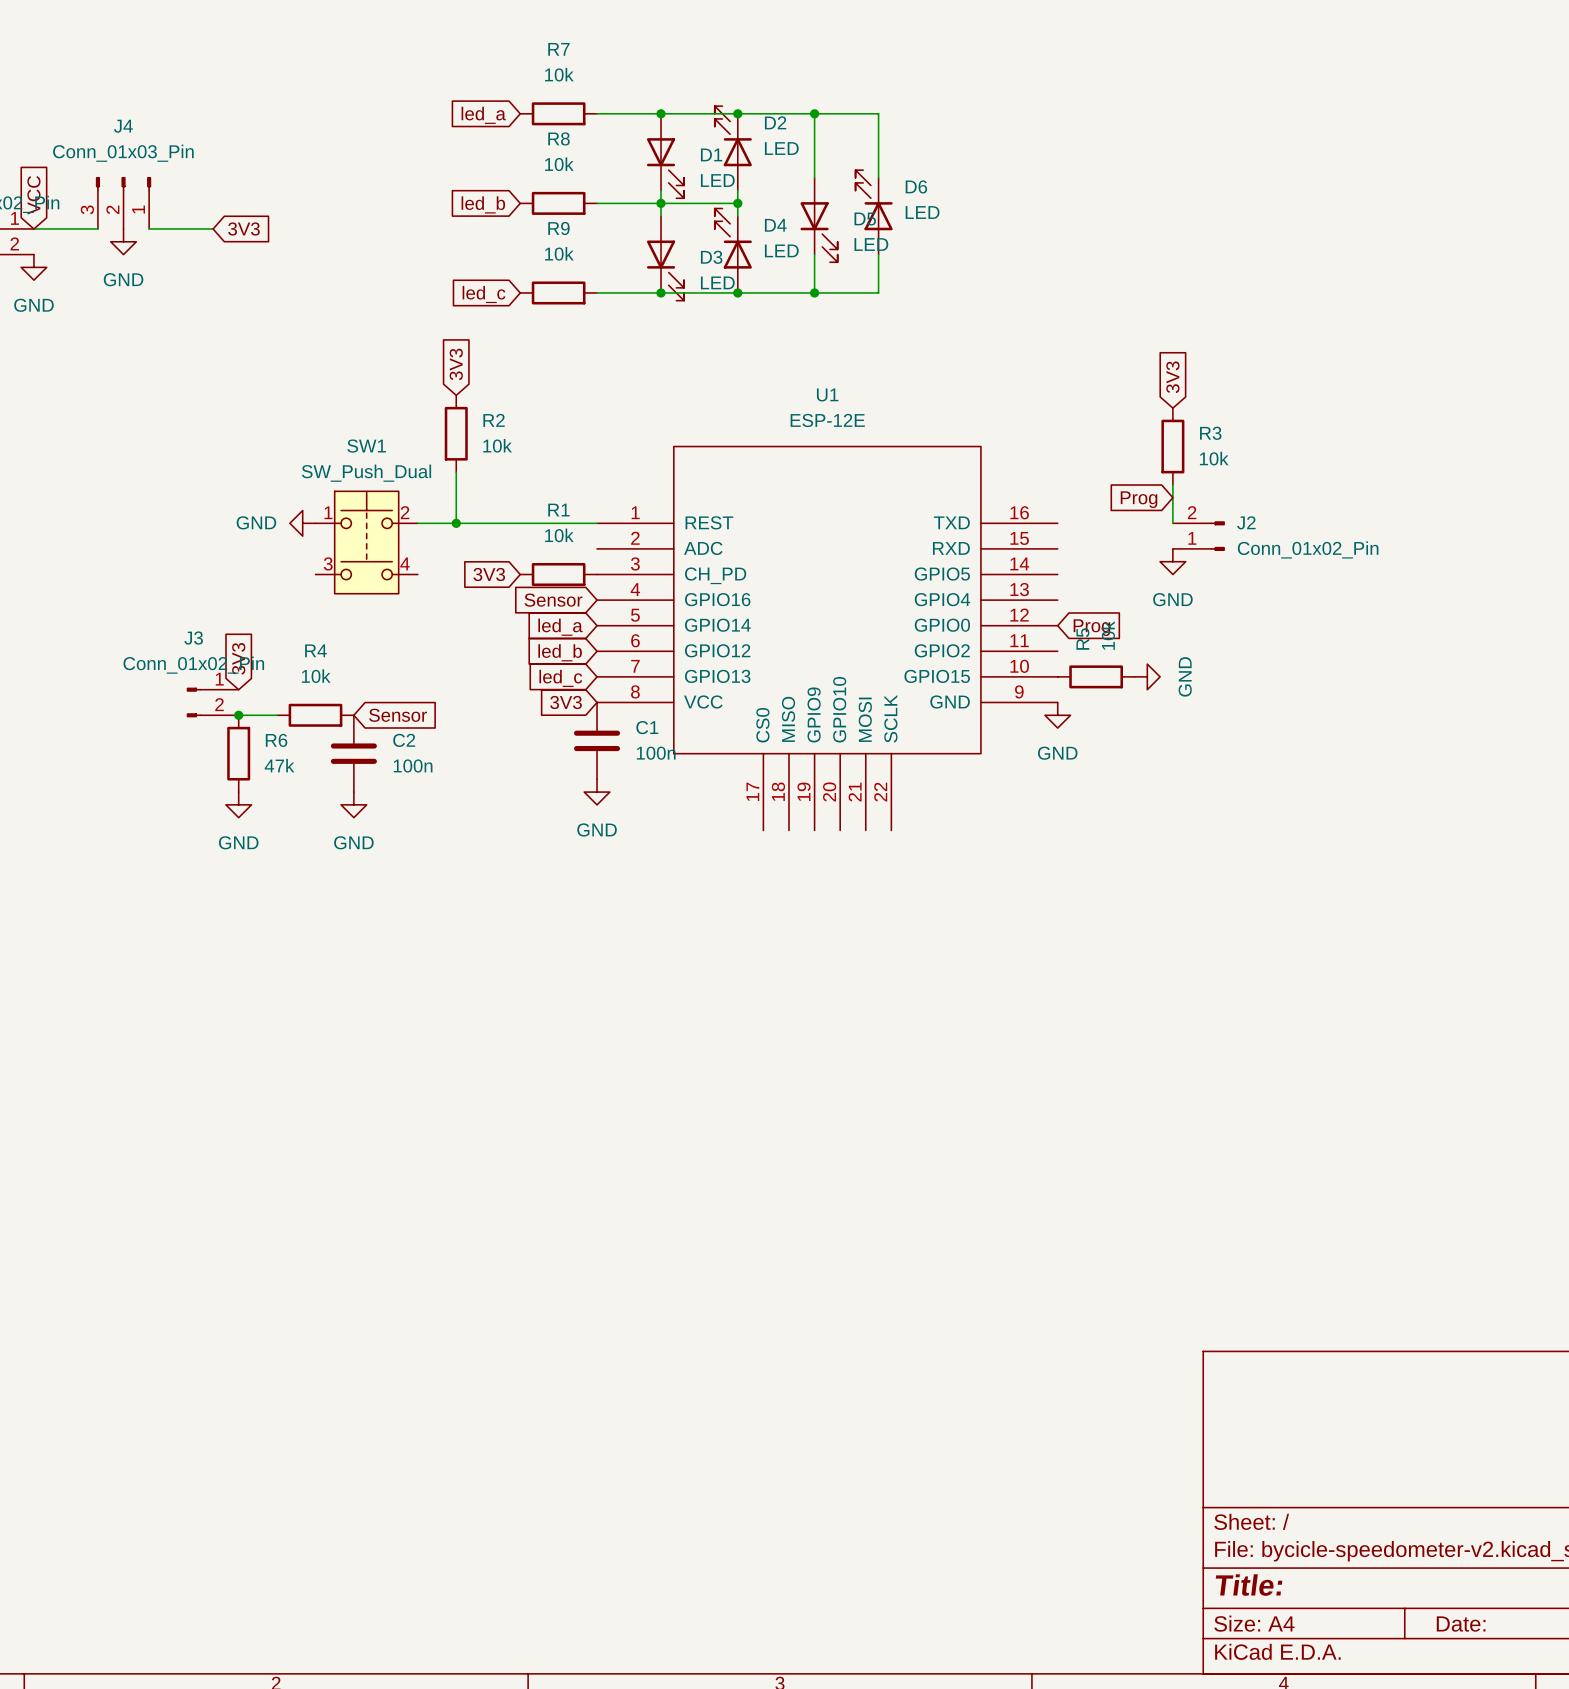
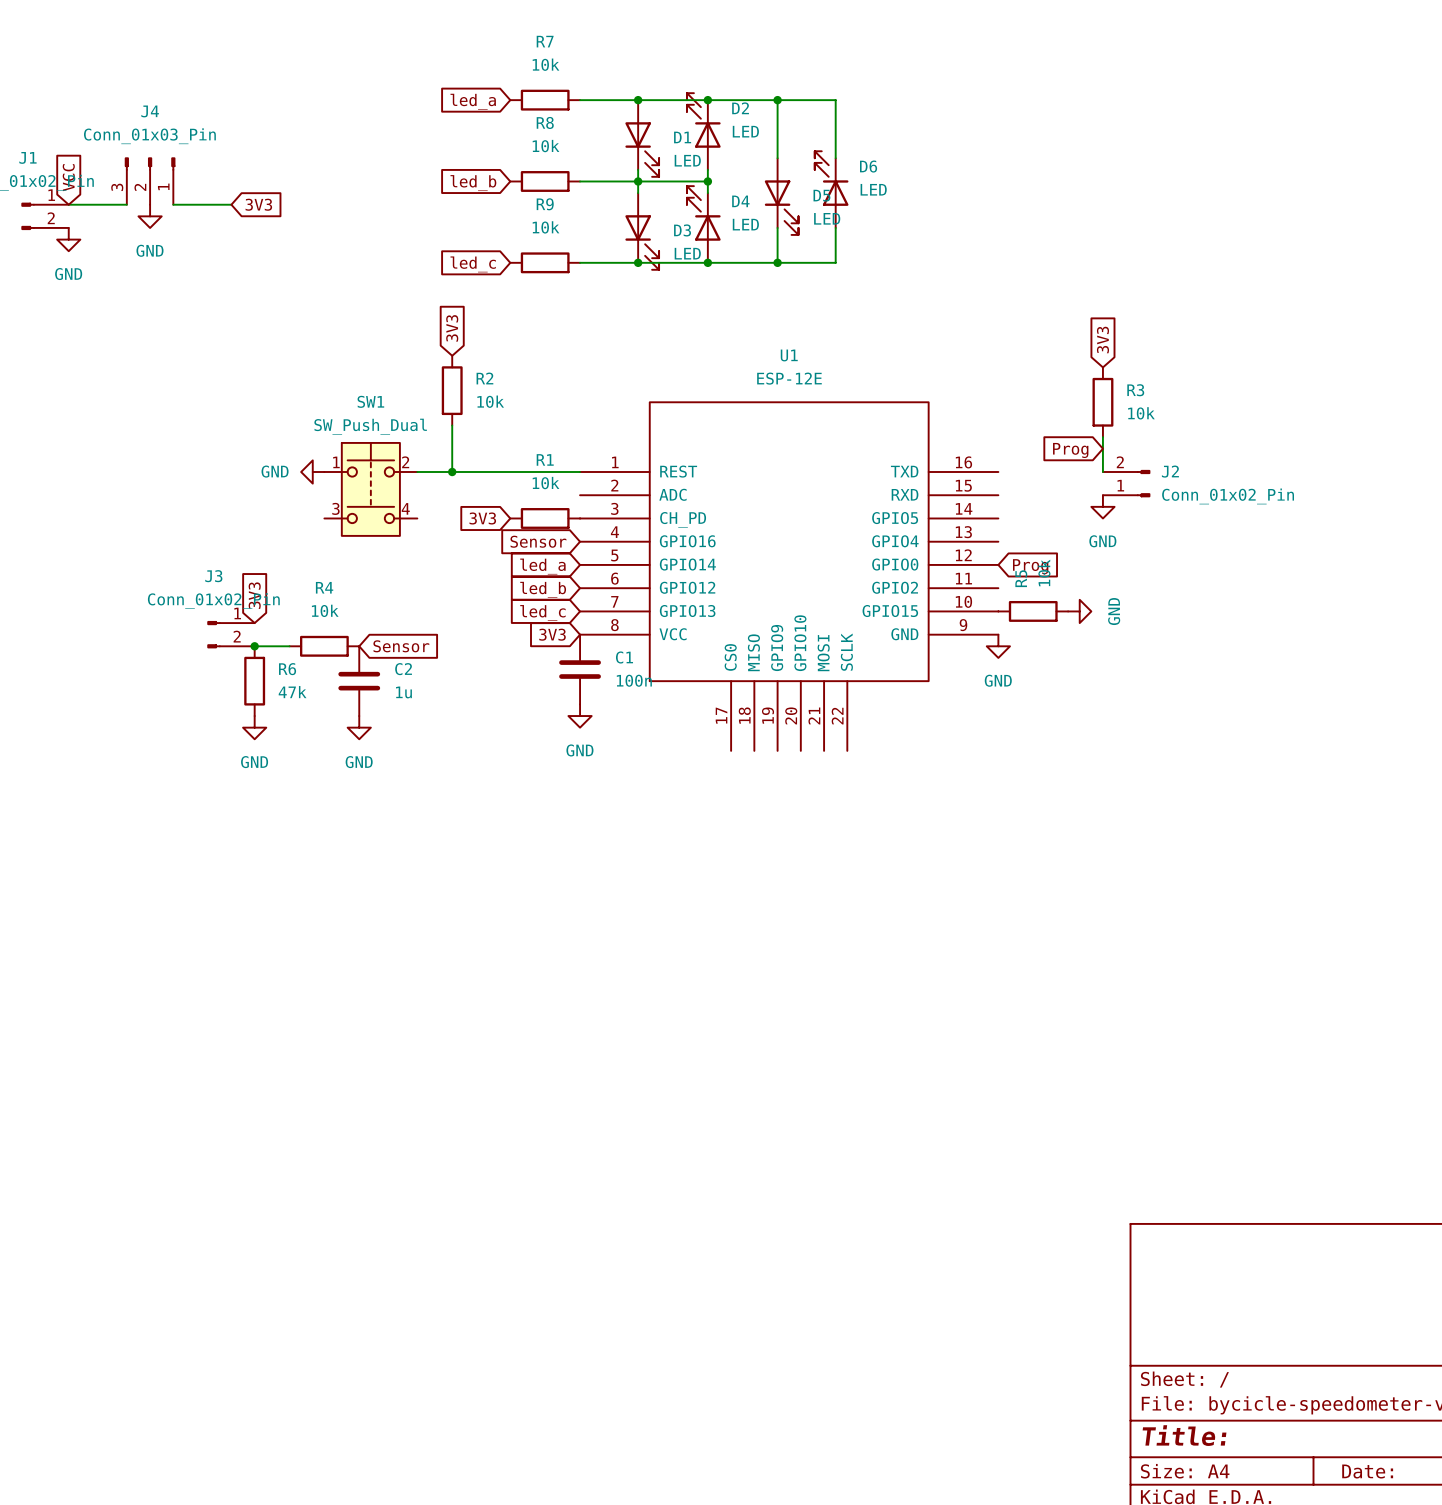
C2 value: 100n (413, 765) -> 1u (403, 692)

